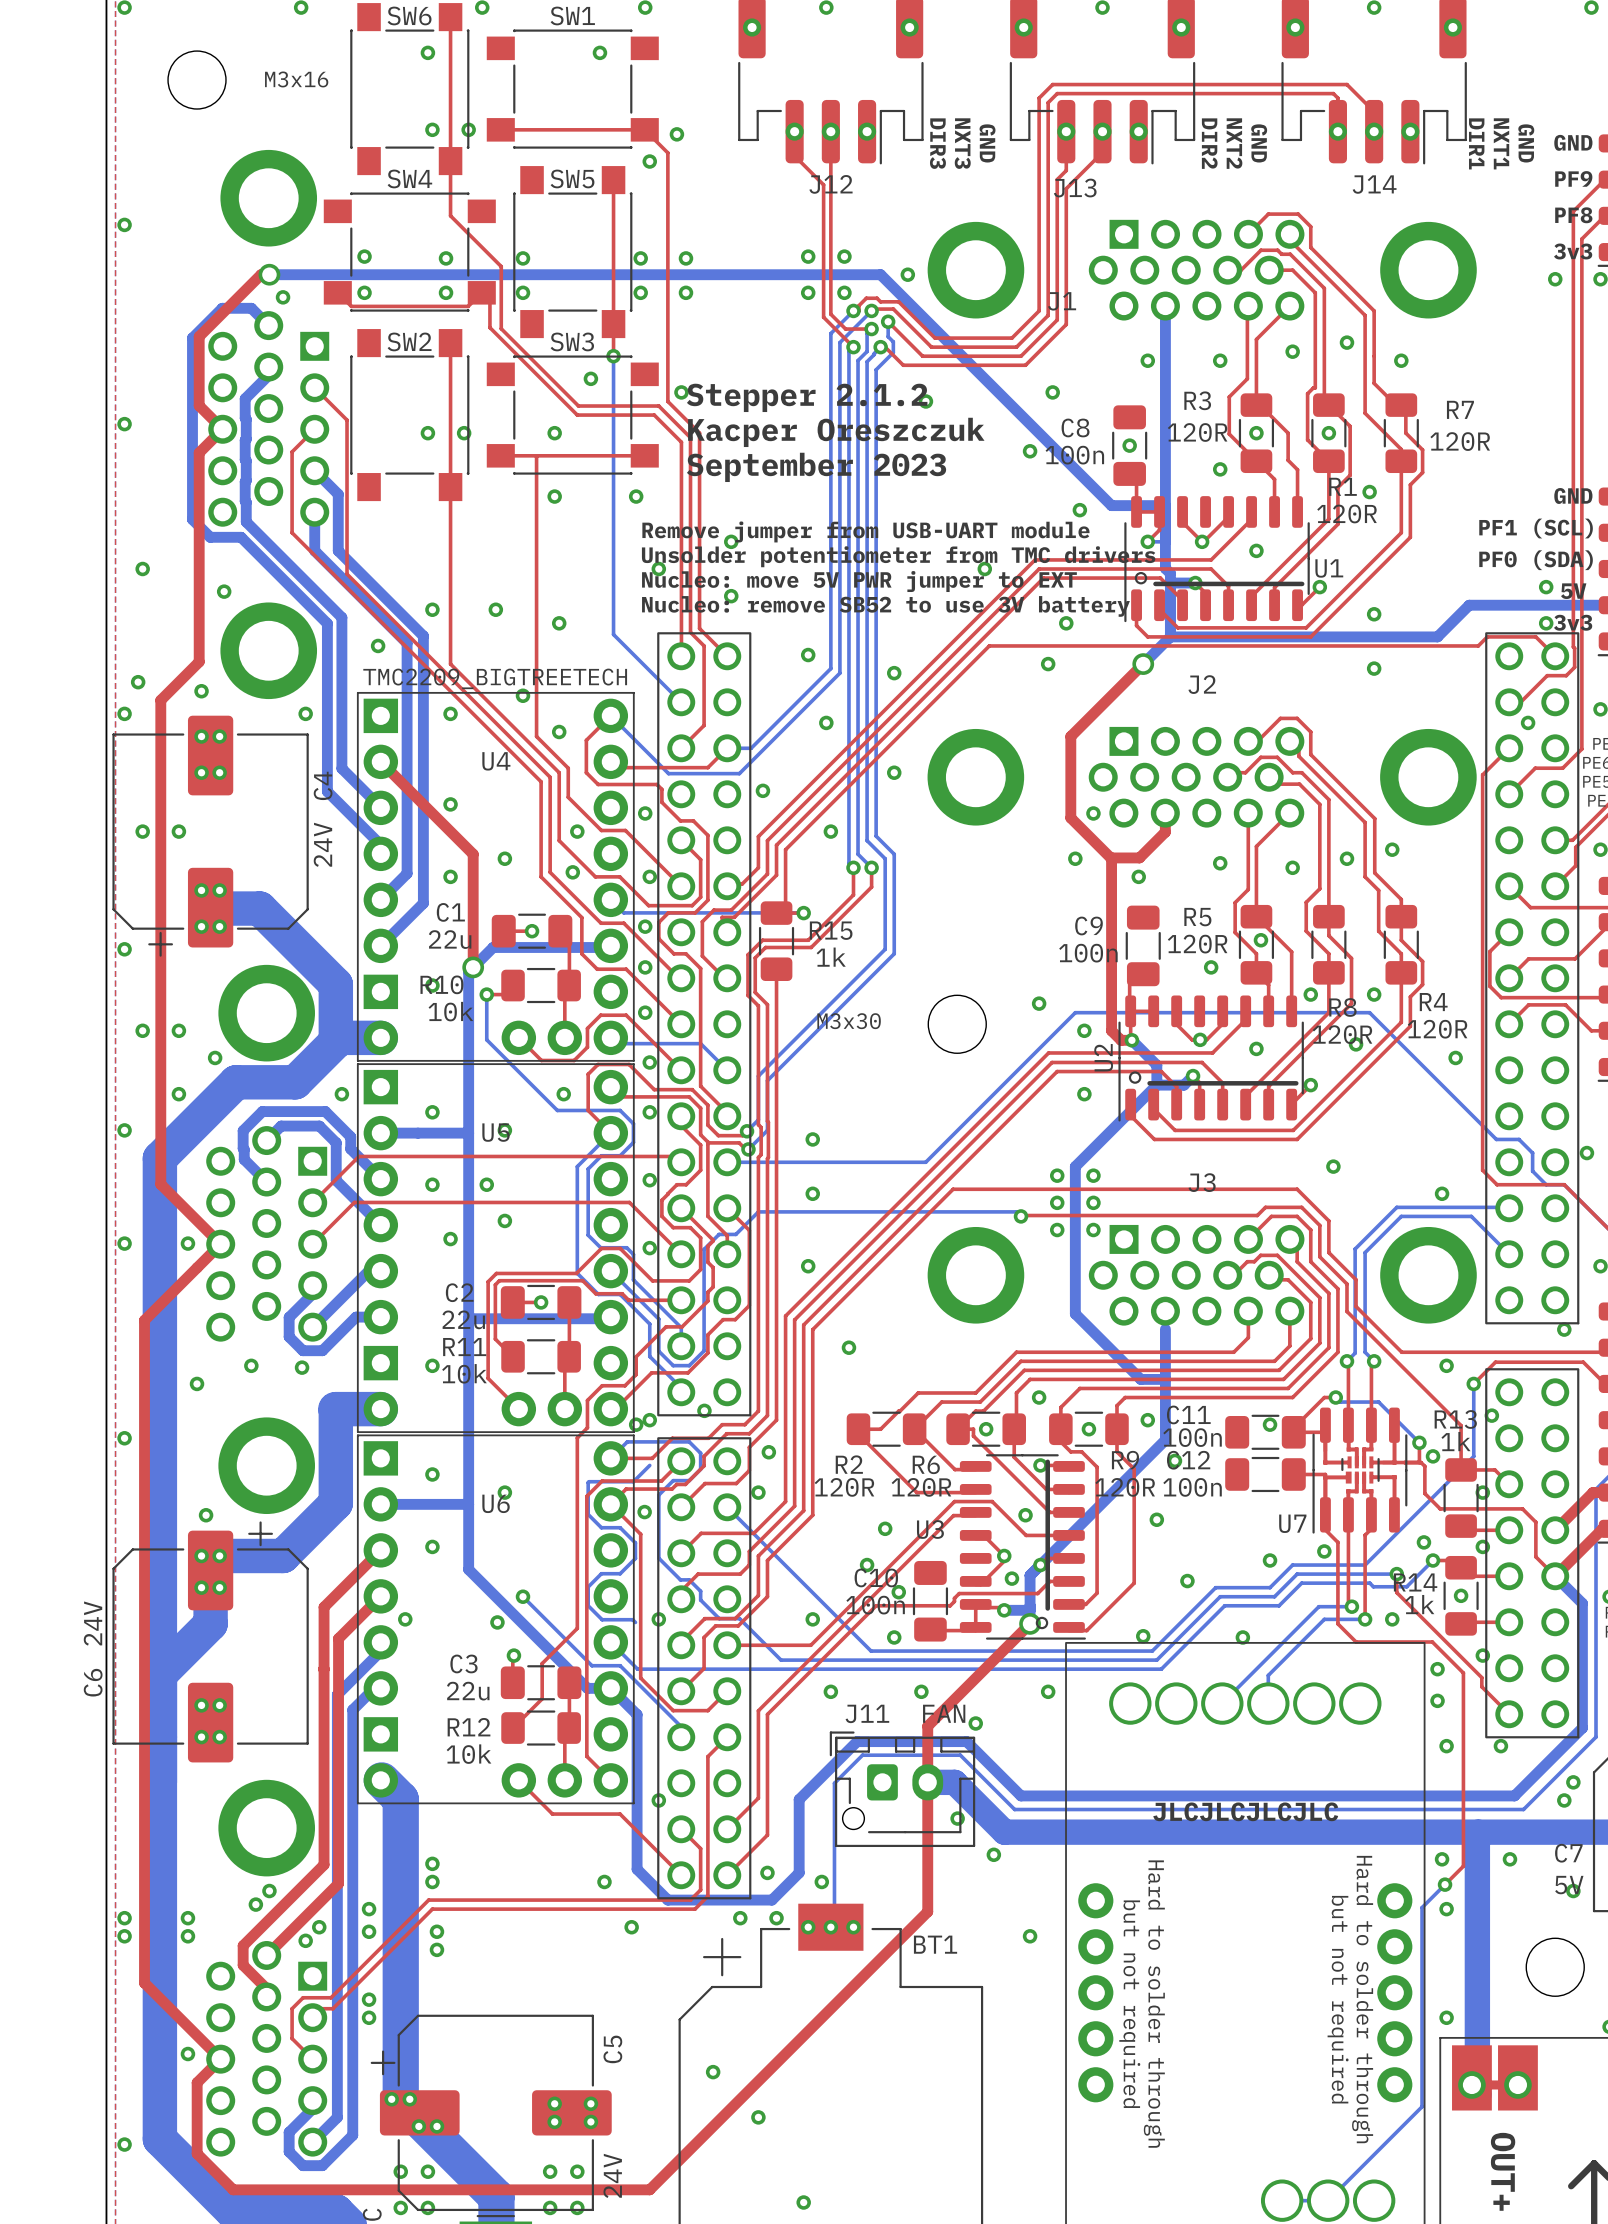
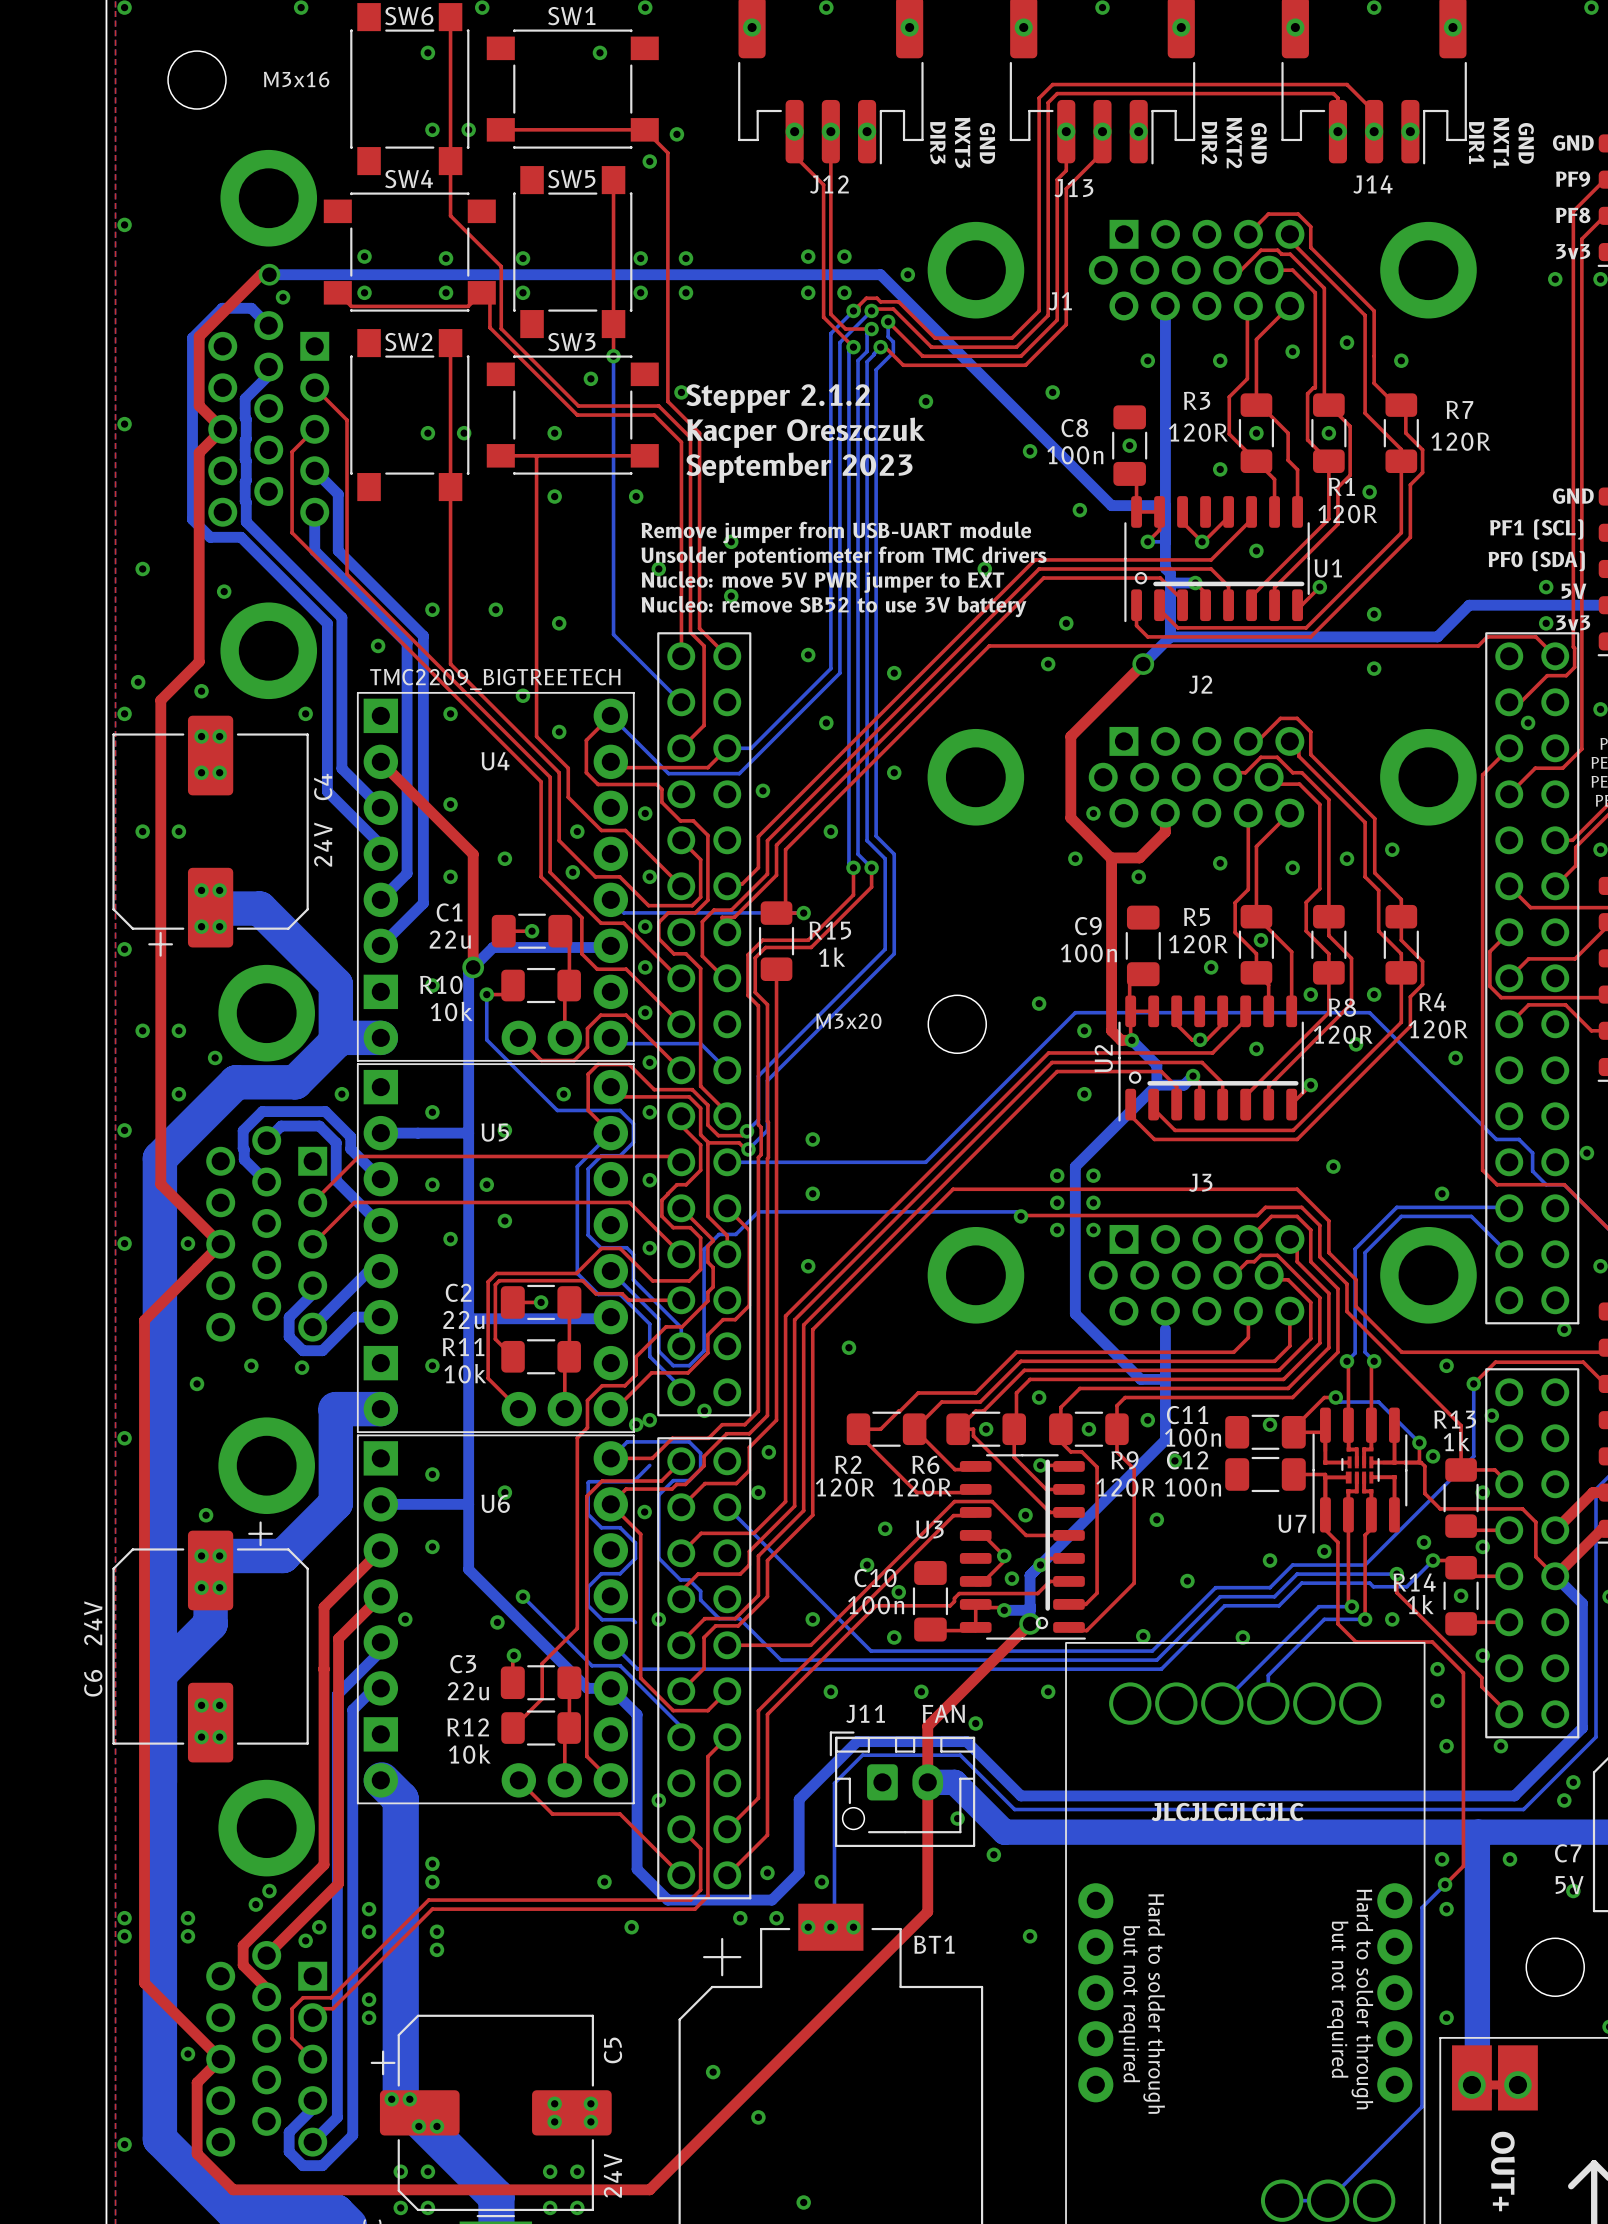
text: M3x30 (849, 1021) -> M3x20 (848, 1021)

